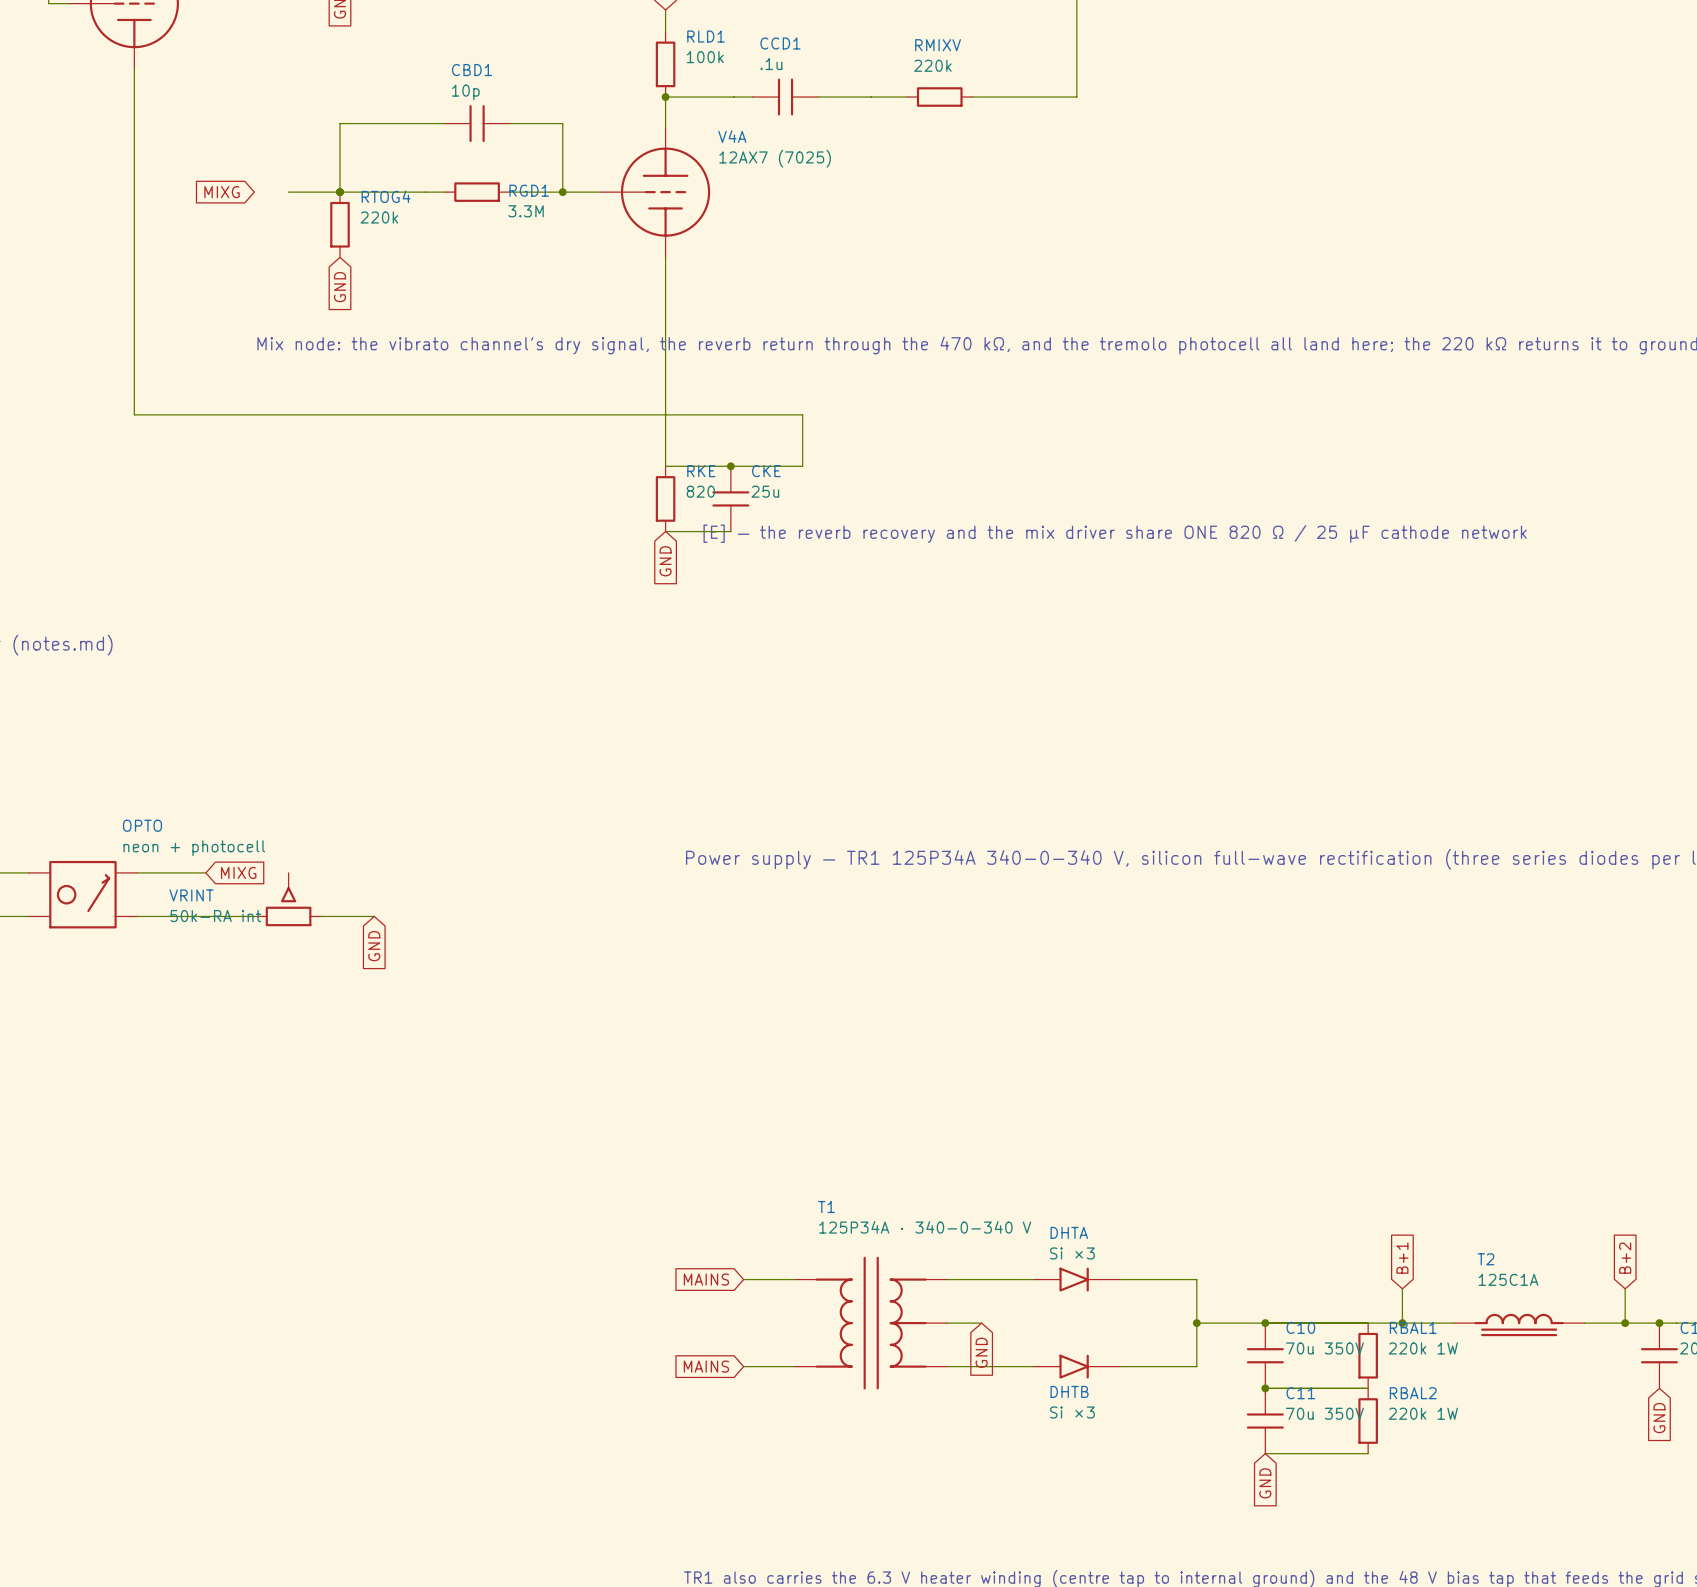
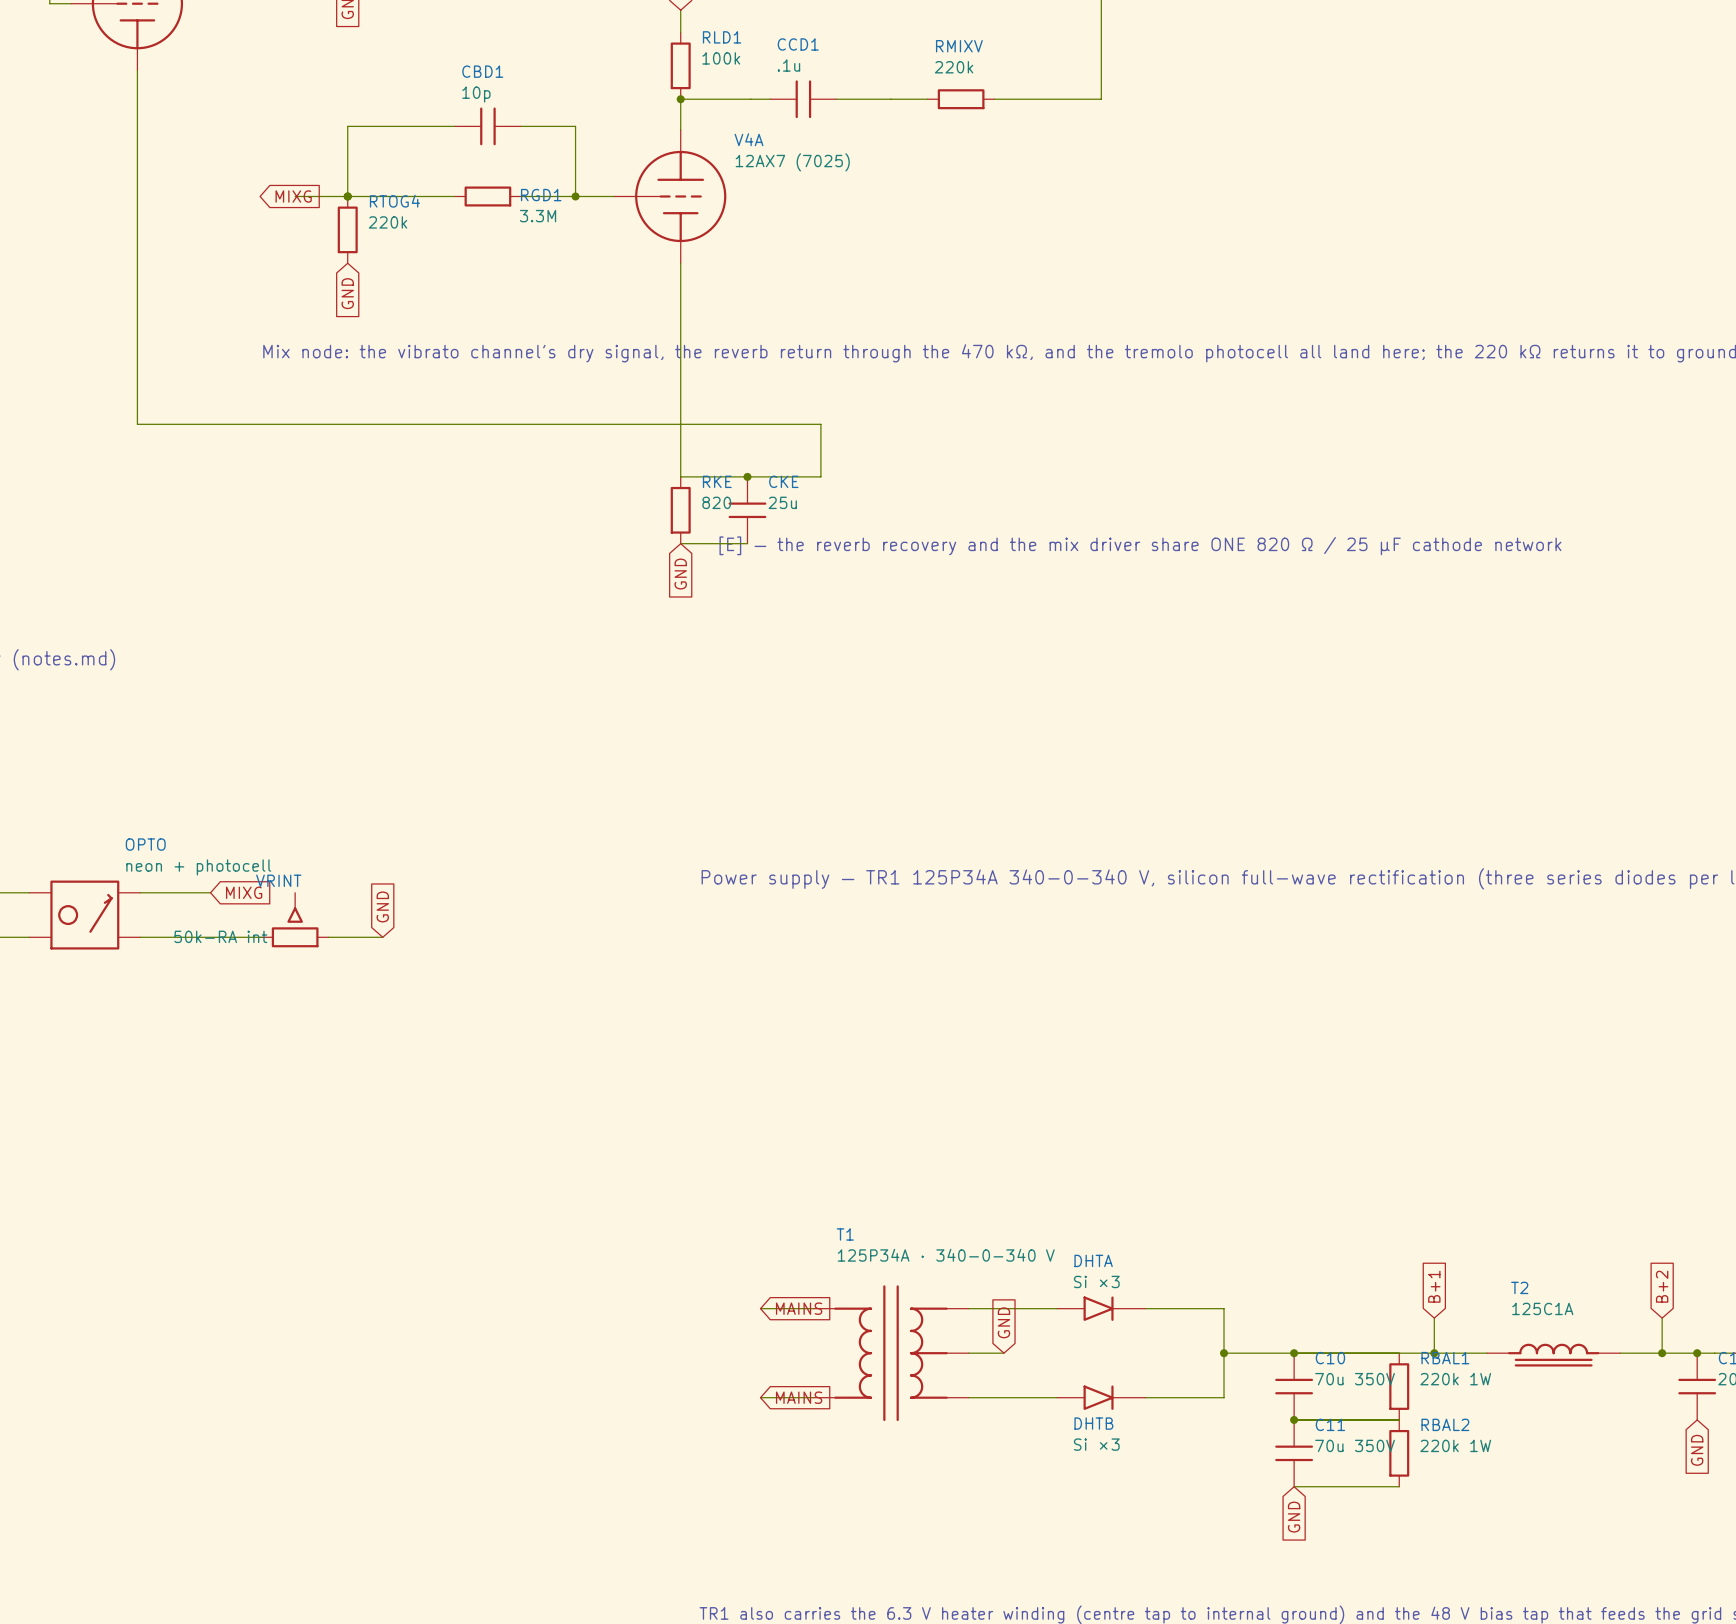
global label rotation: 0° (222, 192) -> 180° (293, 196)
VRINT name position: VRINT (191, 895) -> VRINT (278, 880)
global label rotation: 0° (374, 946) -> 180° (382, 906)
global label rotation: 0° (706, 1279) -> 180° (799, 1308)
global label rotation: 0° (981, 1352) -> 180° (1003, 1322)
global label rotation: 0° (706, 1366) -> 180° (799, 1397)

